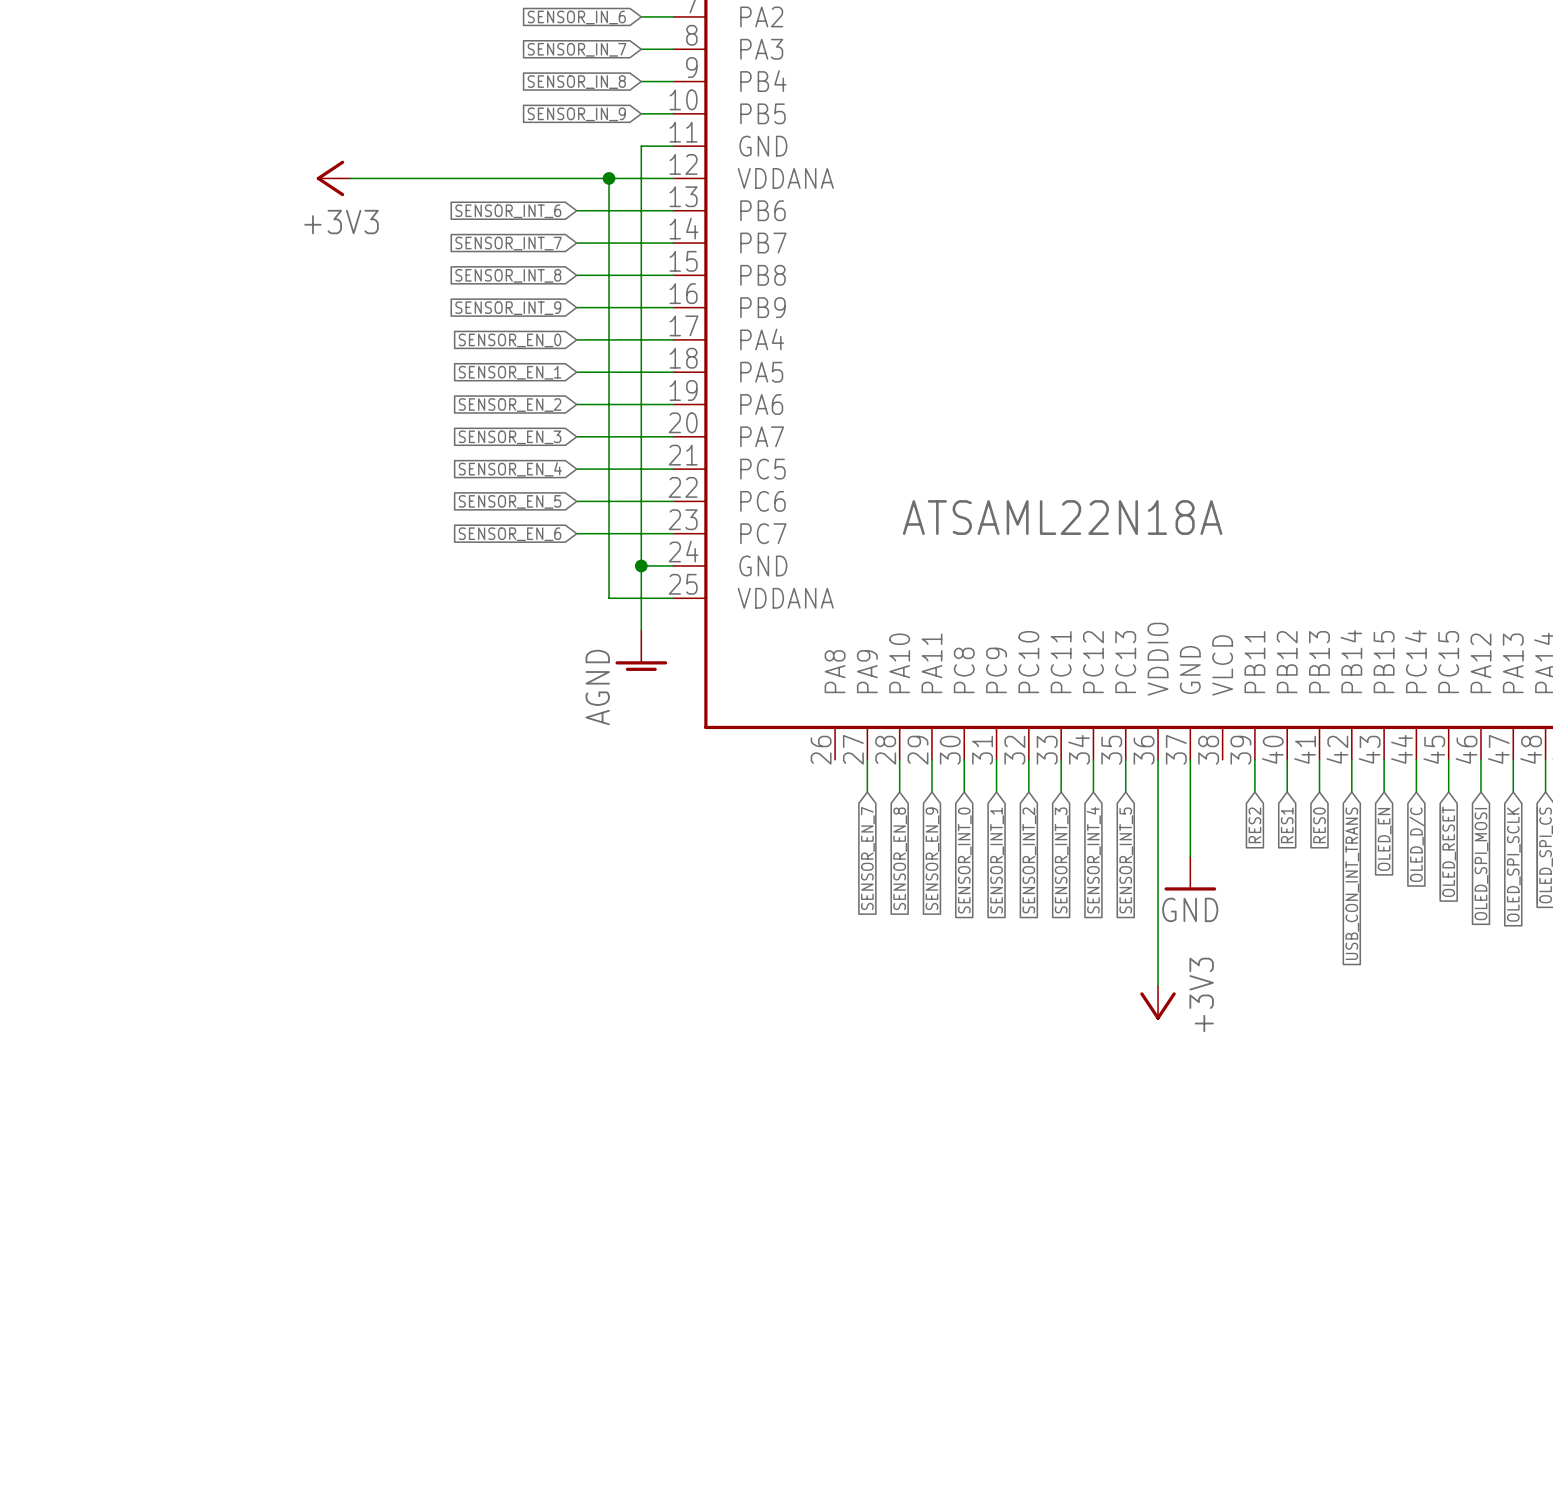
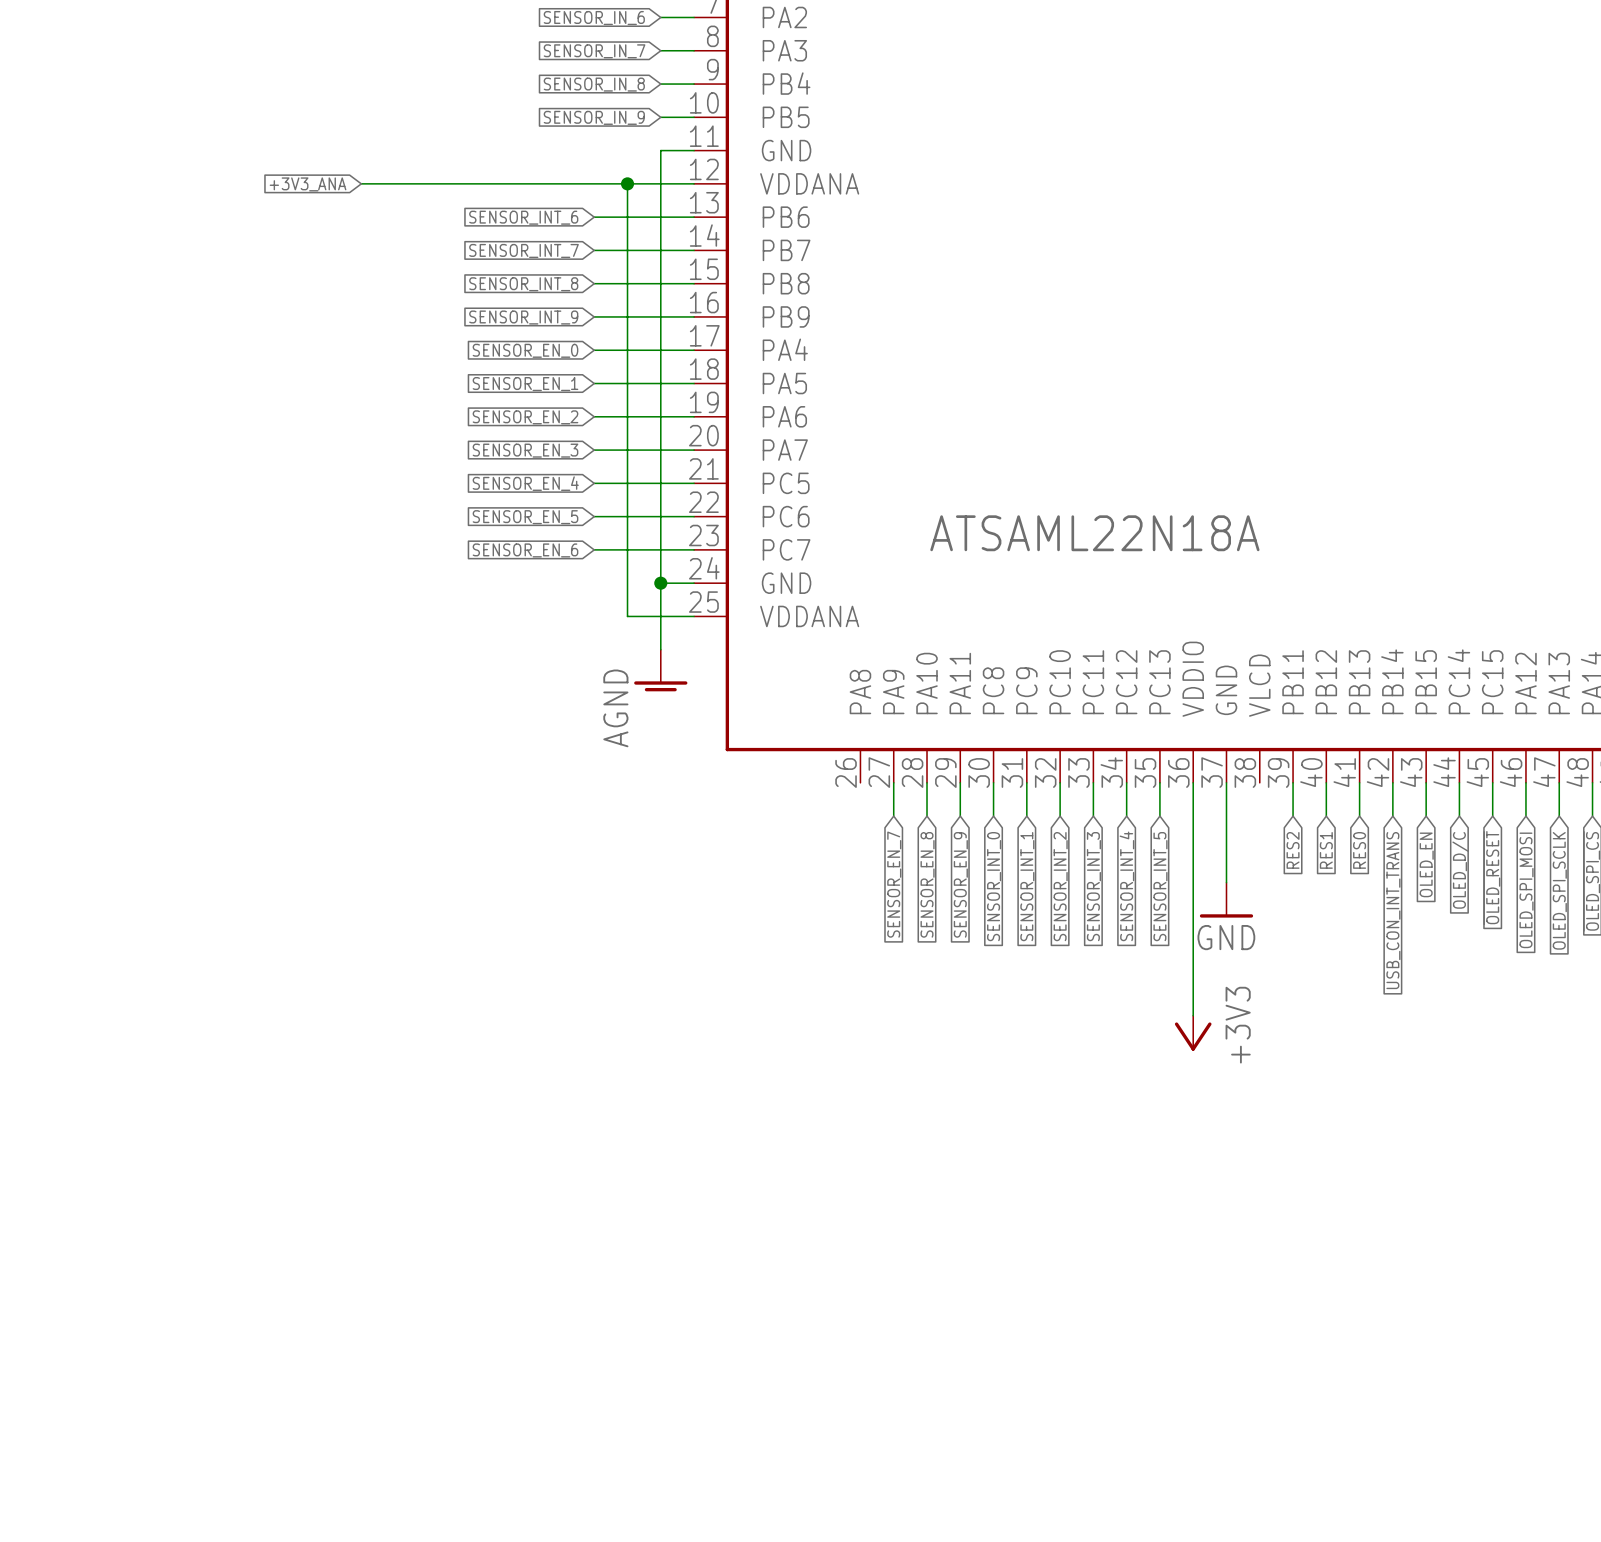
global label: none -> +3V3_ANA (308, 184)
power symbol: +3V3 (333, 178) -> none

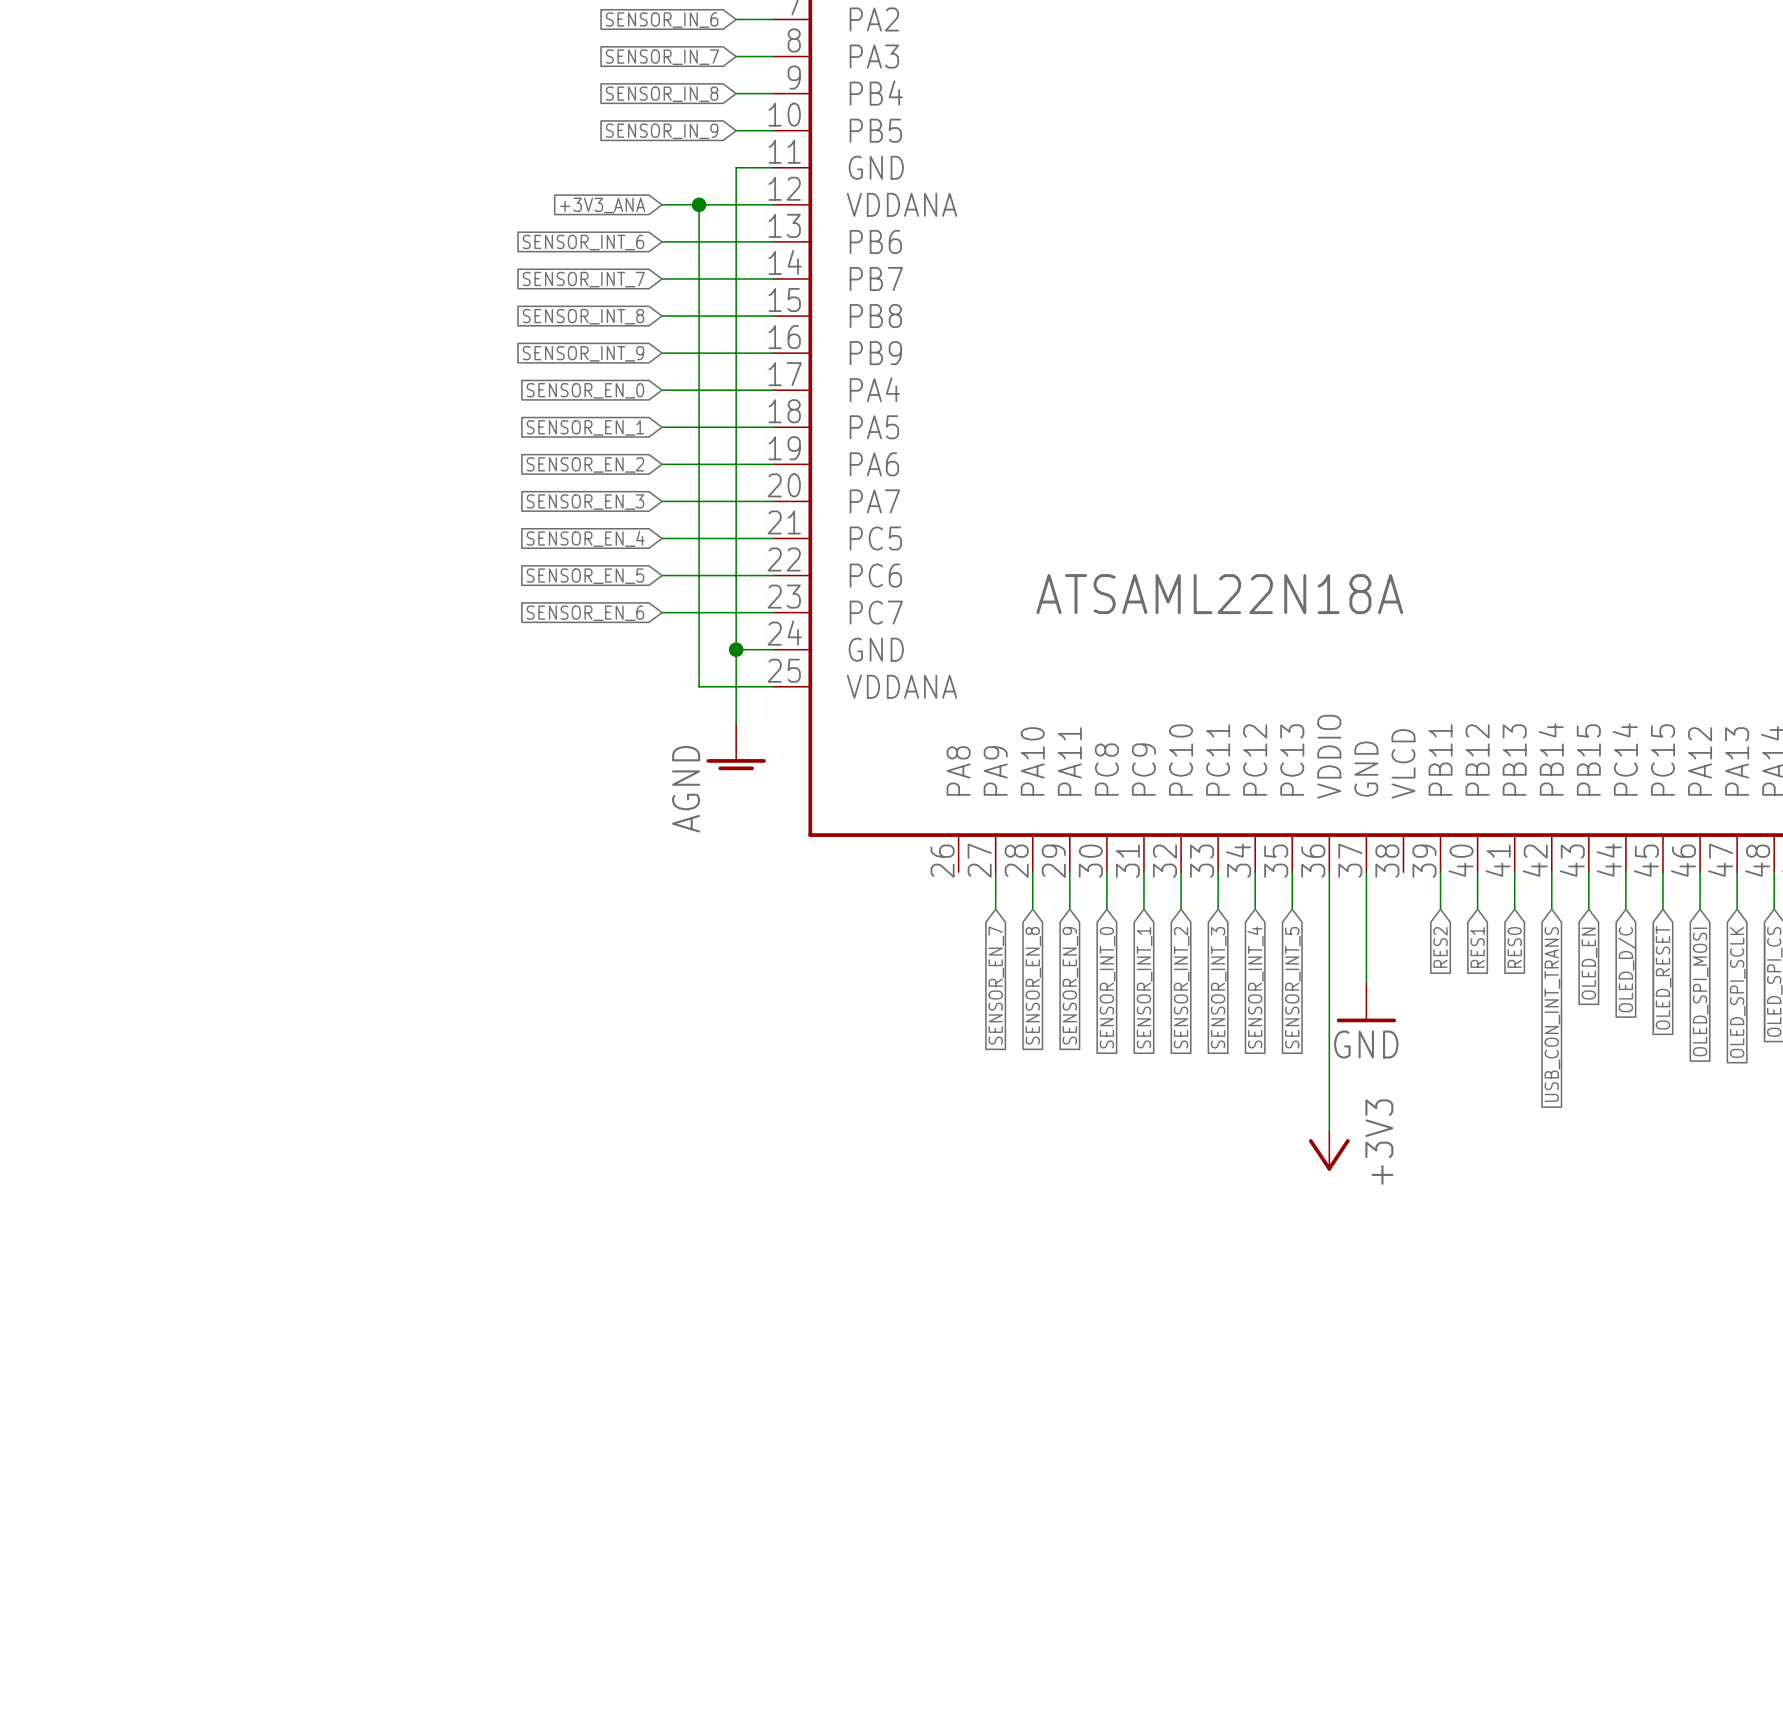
wire: (361, 183) (594, 183) -> none
global label position: +3V3_ANA (308, 184) -> +3V3_ANA (602, 205)

